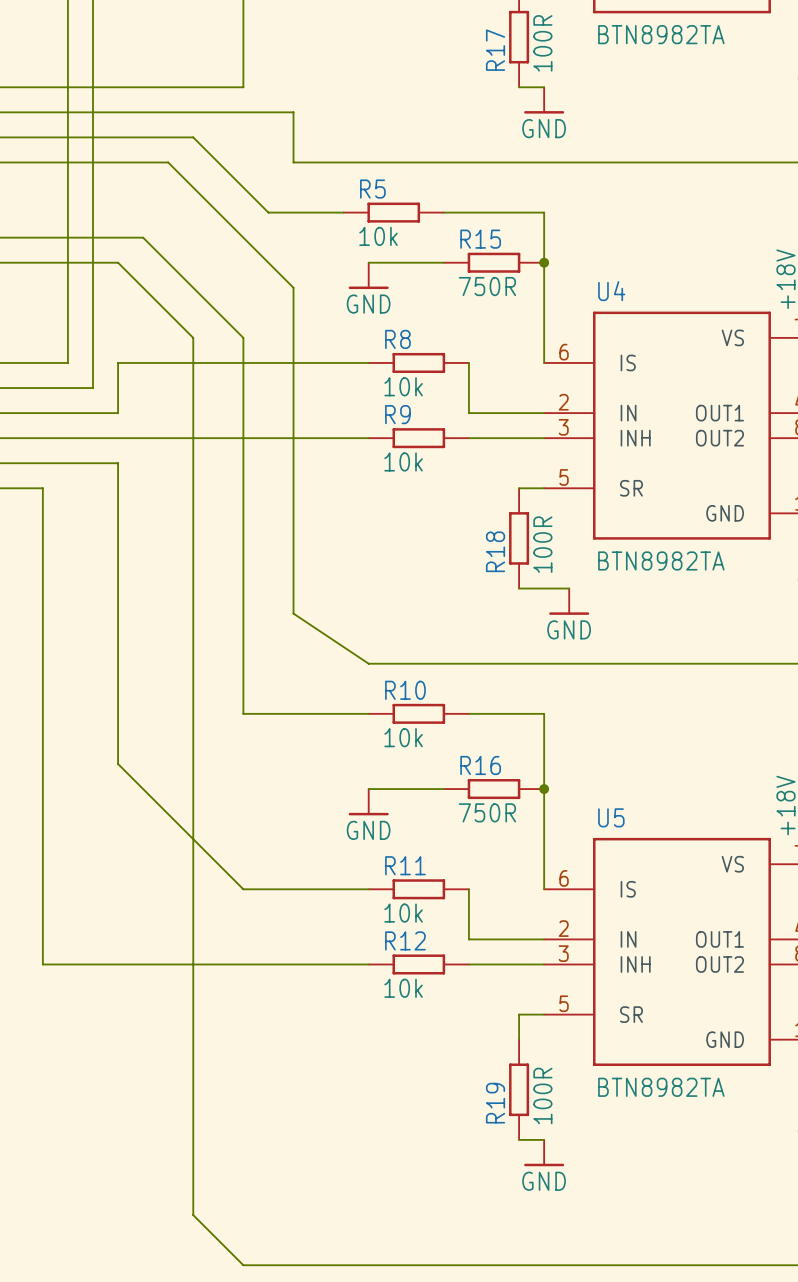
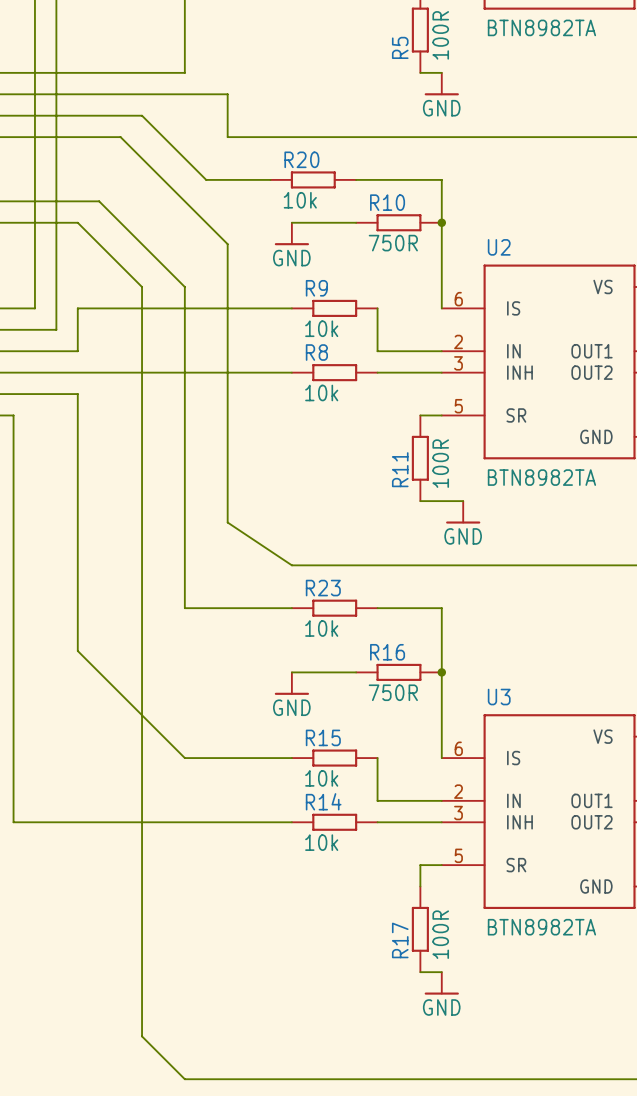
R17 name: R17 (495, 50) -> R5 (400, 47)
R5 name: R5 (372, 189) -> R20 (301, 159)
R15 name: R15 (480, 239) -> R10 (387, 202)
U4 name: U4 (611, 291) -> U2 (499, 247)
R8 name: R8 (397, 339) -> R9 (316, 288)
R9 name: R9 (397, 414) -> R8 (316, 352)
R18 name: R18 (495, 551) -> R11 (400, 469)
R10 name: R10 (405, 690) -> R23 (323, 588)
U5 name: U5 (611, 817) -> U3 (499, 697)
R11 name: R11 (405, 865) -> R15 (323, 737)
R12 name: R12 (405, 940) -> R14 (323, 801)
R19 name: R19 (495, 1103) -> R17 (400, 940)

